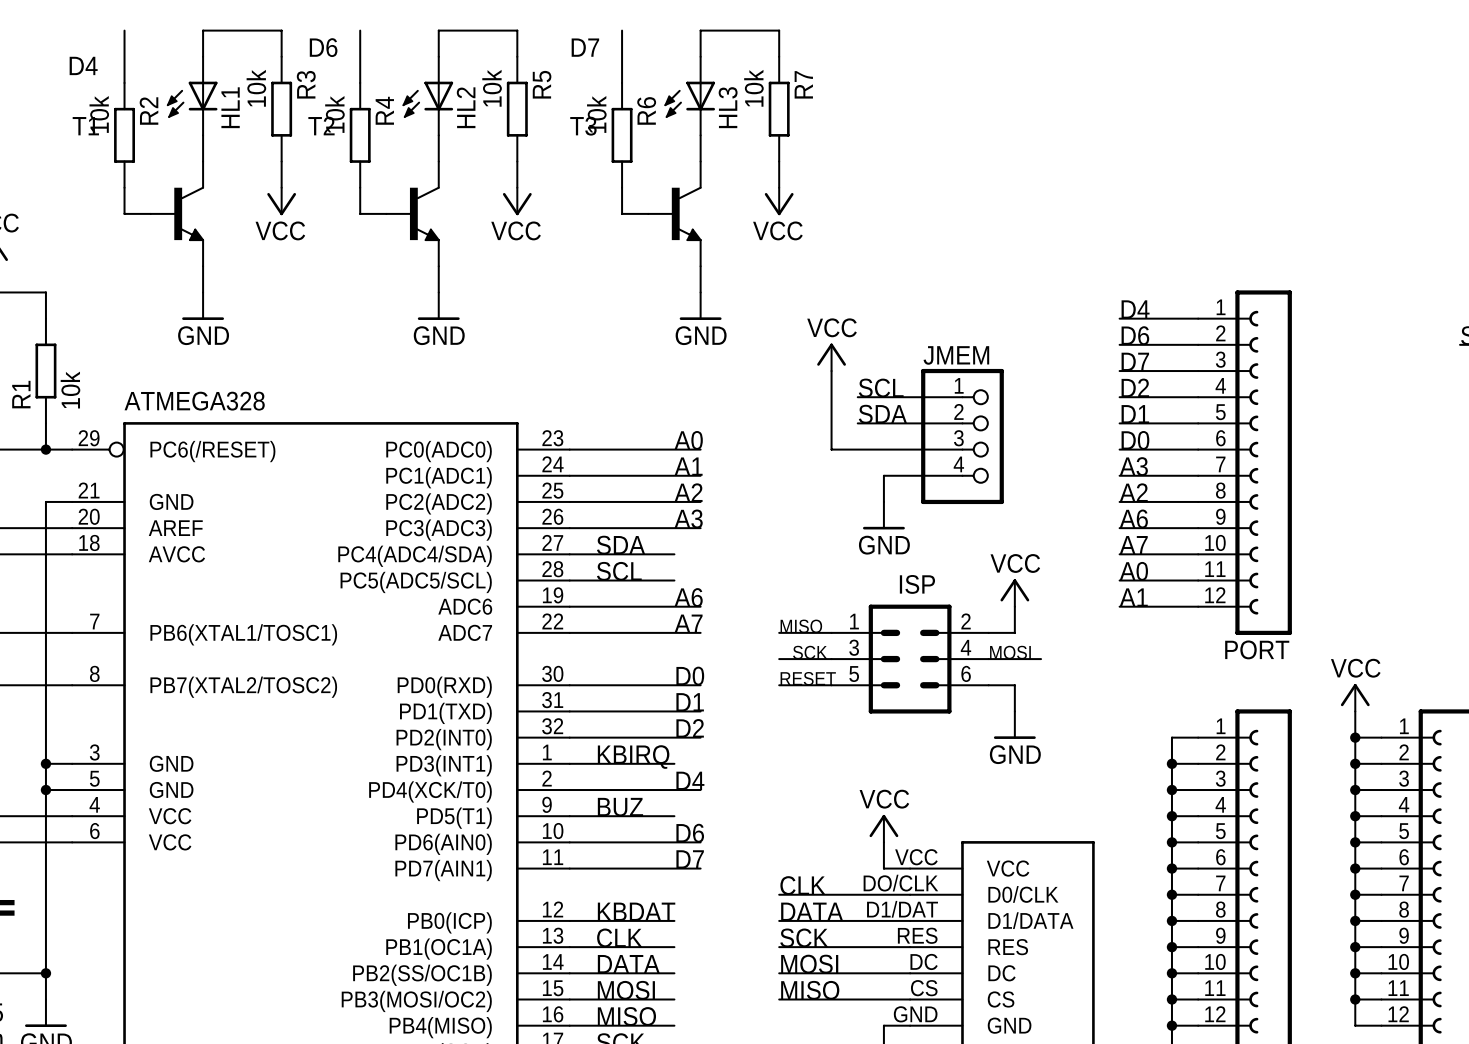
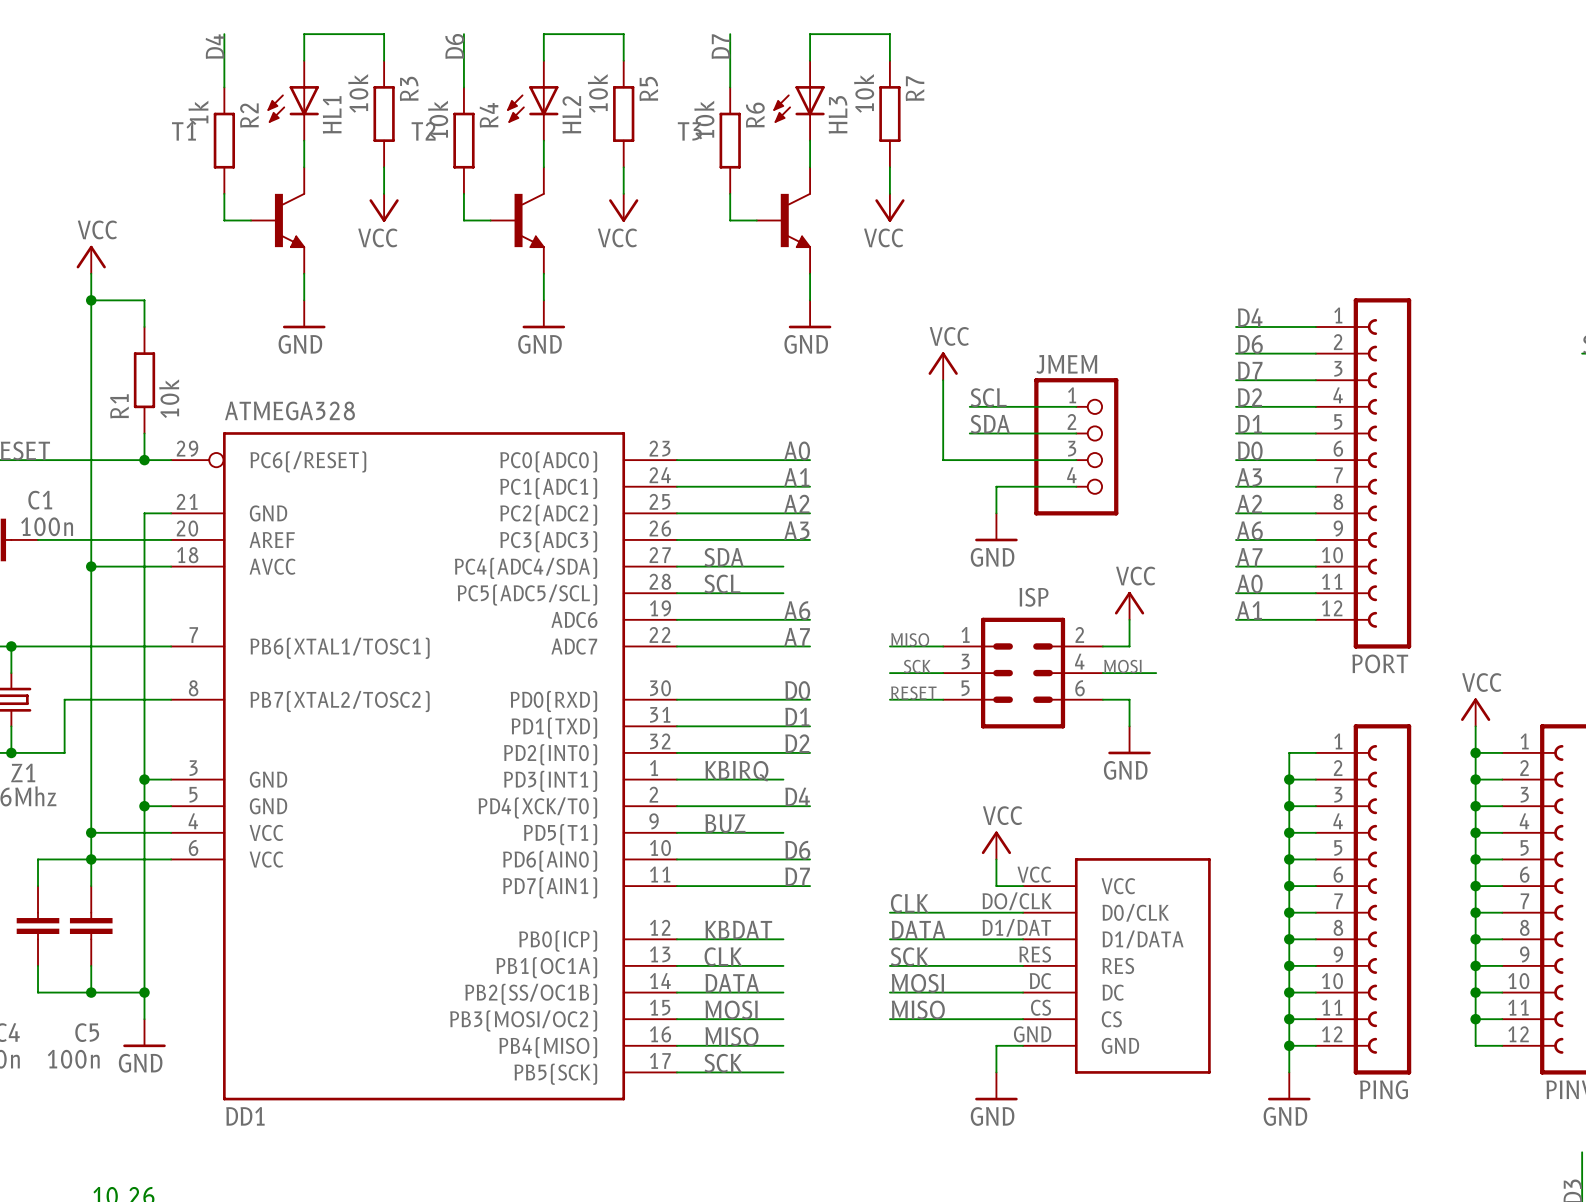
label rotation: 0° (323, 47) -> 90° counterclockwise (454, 46)
label rotation: 0° (585, 47) -> 90° counterclockwise (720, 46)
label rotation: 0° (83, 65) -> 90° counterclockwise (215, 46)
label position: D4 (83, 65) -> D4 (215, 46)
R2 value: 10k (99, 114) -> 1k (198, 112)

